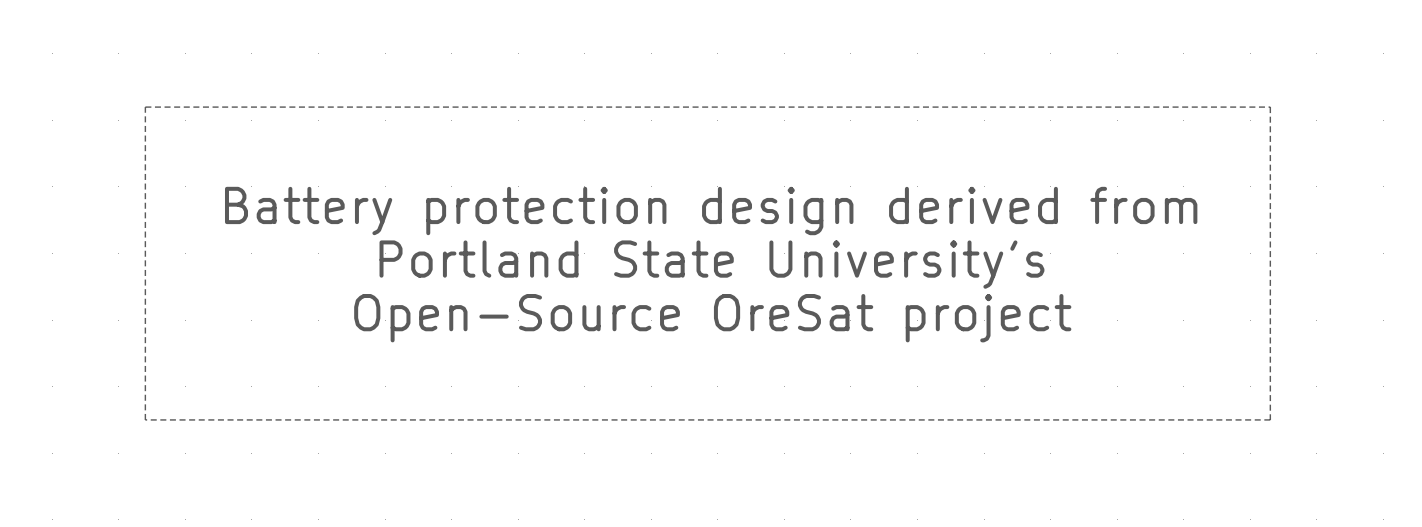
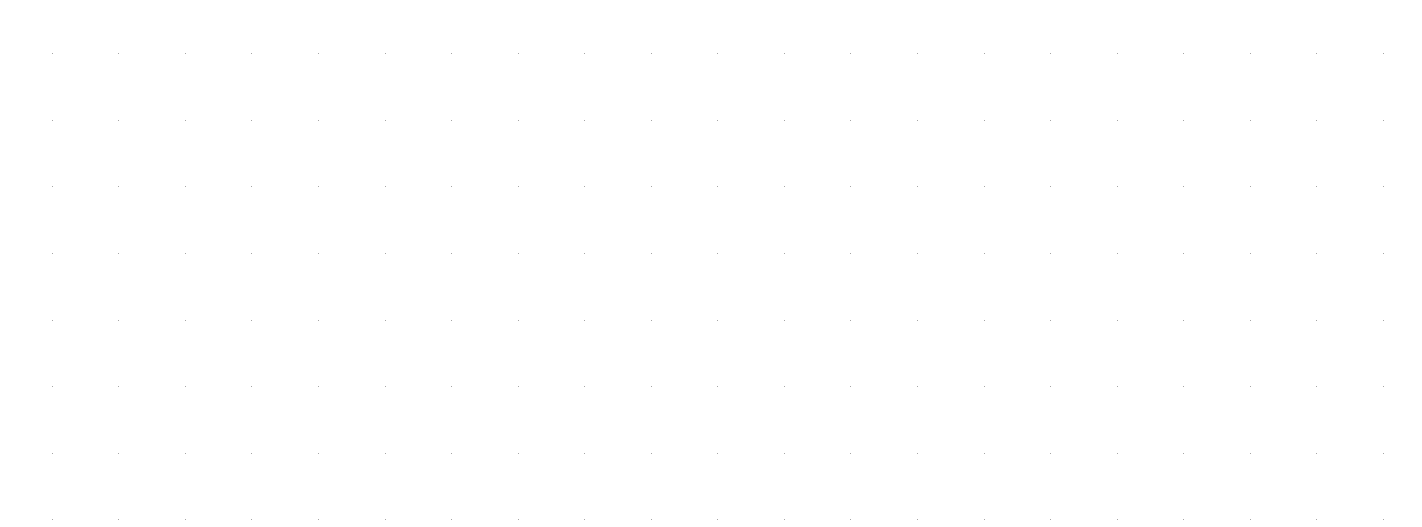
line: (145, 107) (1270, 107) (1270, 419) (145, 419) (145, 107) -> none
text: Battery protection design derived from (711, 211) -> none
text: Portland State University's (711, 264) -> none
text: Open-Source OreSat project (712, 318) -> none

